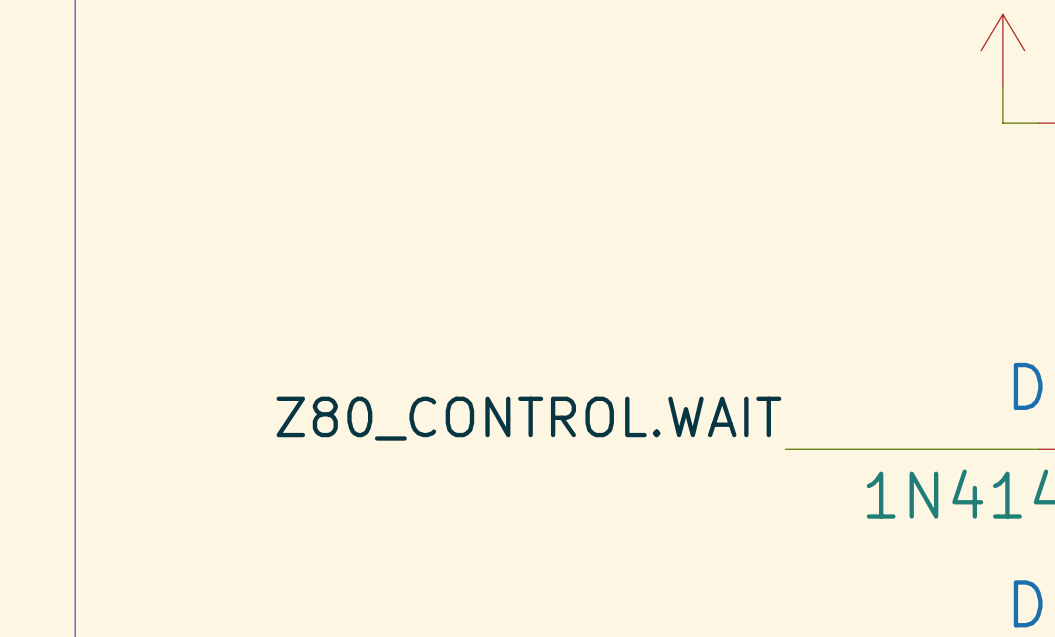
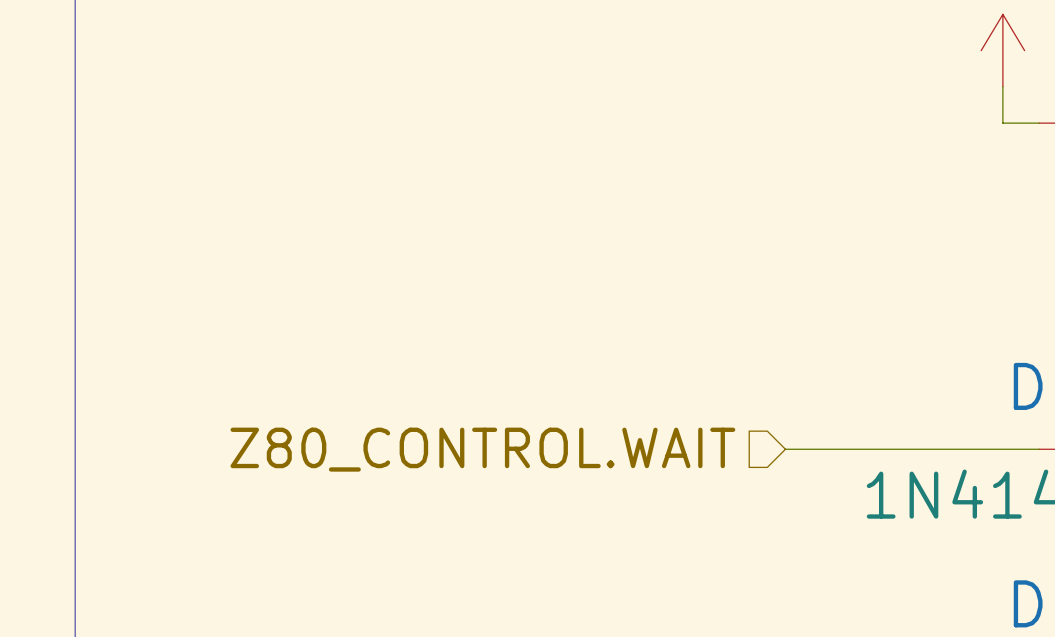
label: Z80_CONTROL.WAIT (528, 418) -> none
hierarchical label: none -> Z80_CONTROL.WAIT (482, 449)

